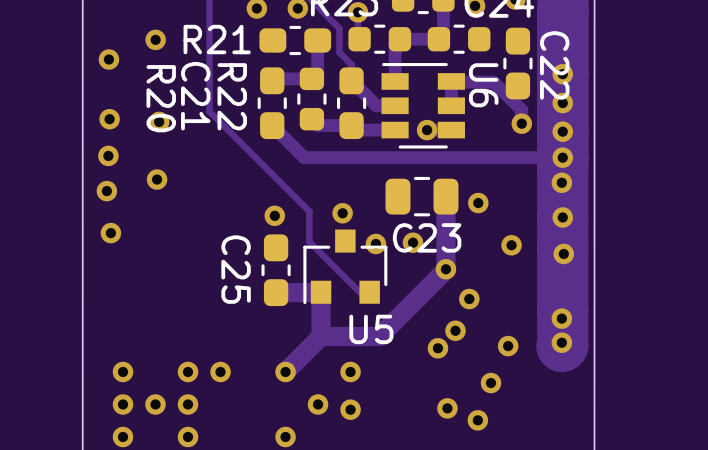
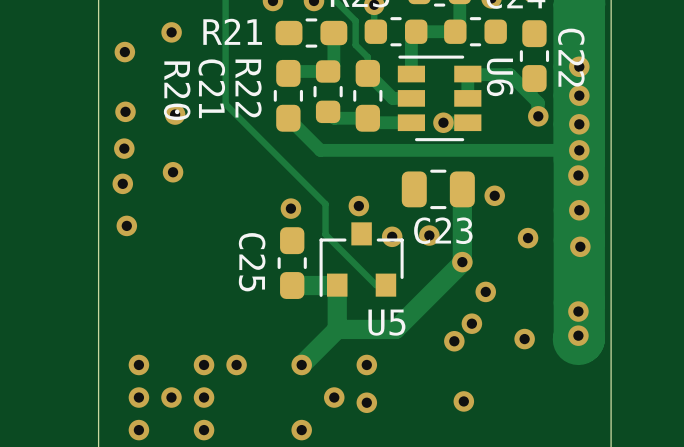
via: (491, 383) -> none
via: (477, 420) -> none

